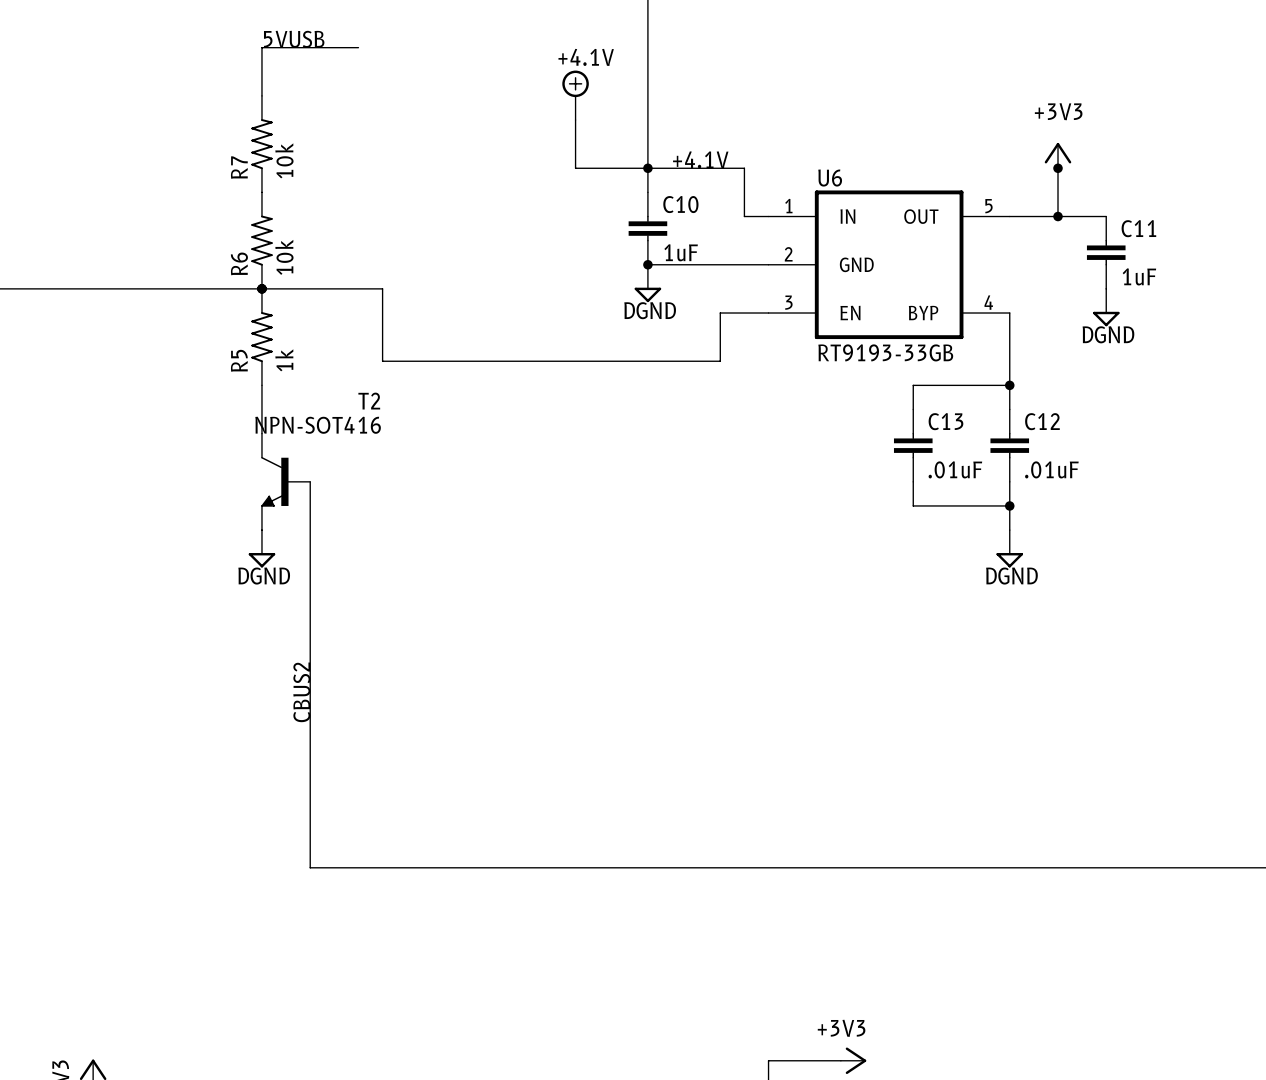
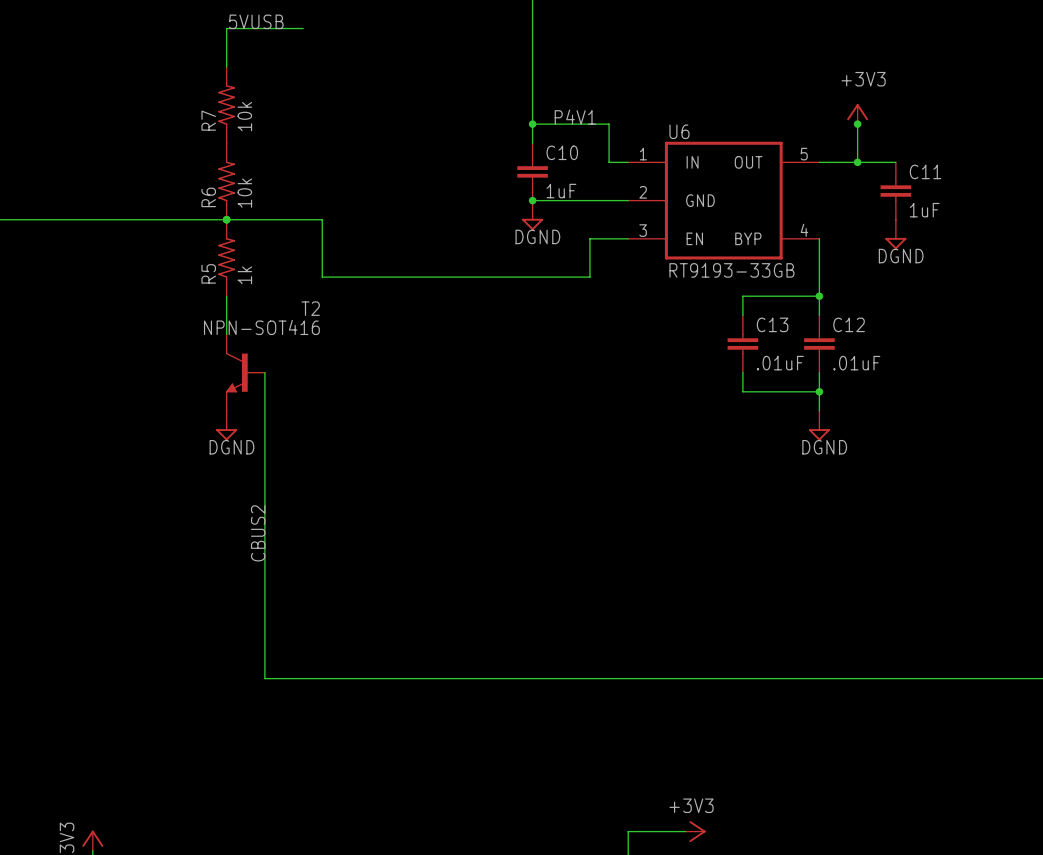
power symbol: +4.1V (575, 95) -> none
wire: (575, 120) (575, 168) (647, 168) -> none
label: +4.1V (700, 159) -> P4V1 (575, 117)

